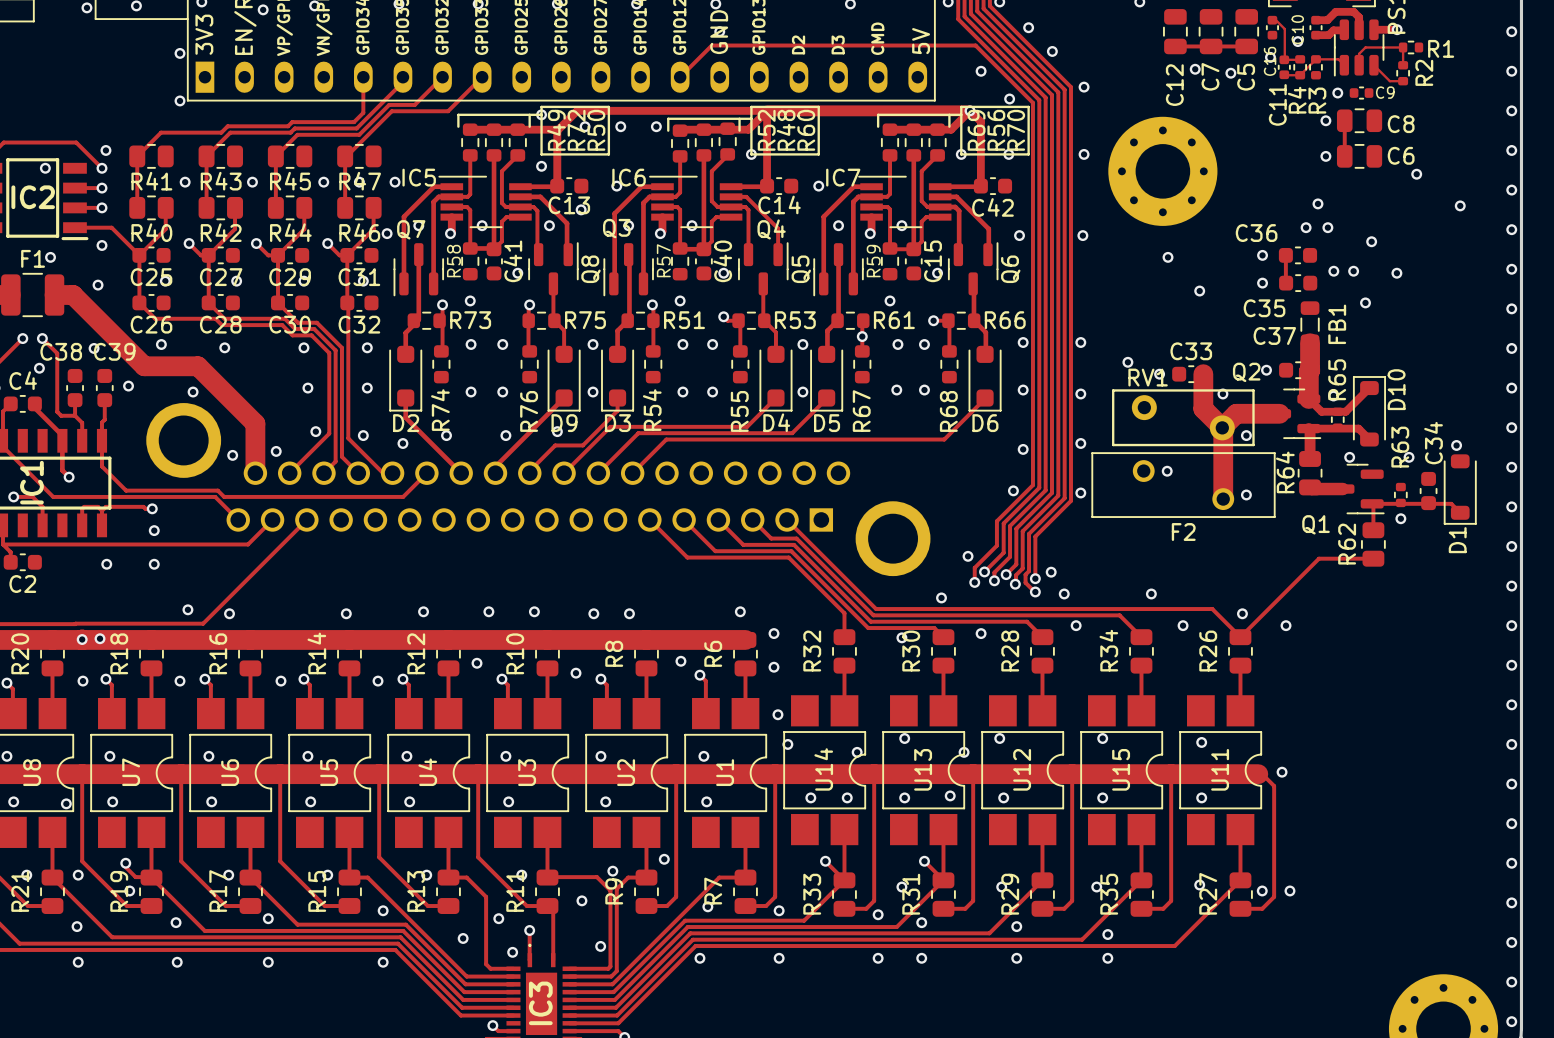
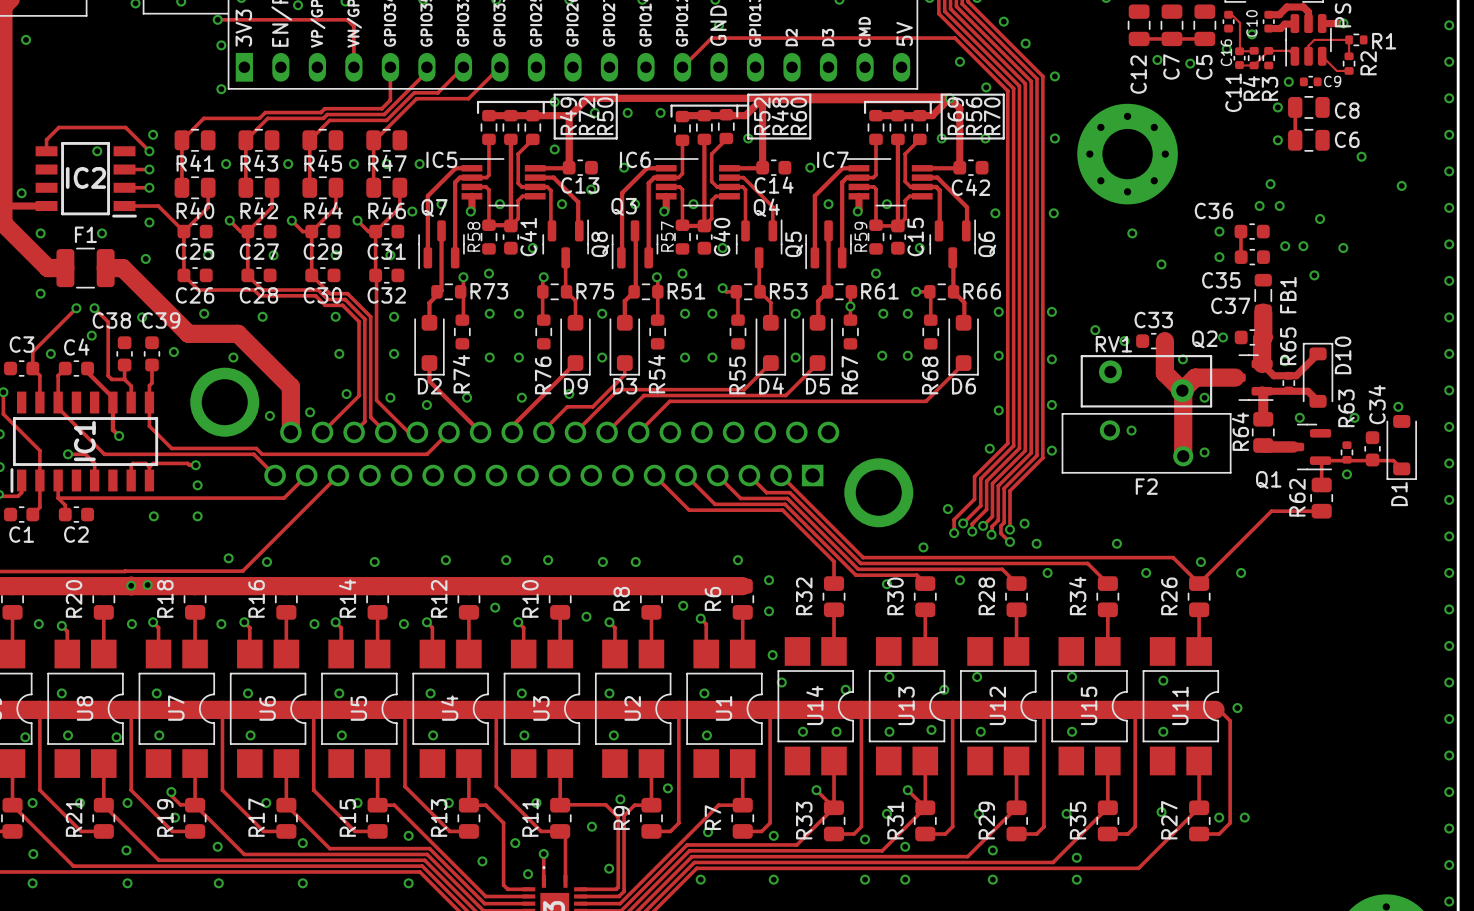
track: none -> (217, 19) (347, 19) (353, 26) (353, 67)
via: none -> (217, 19)

